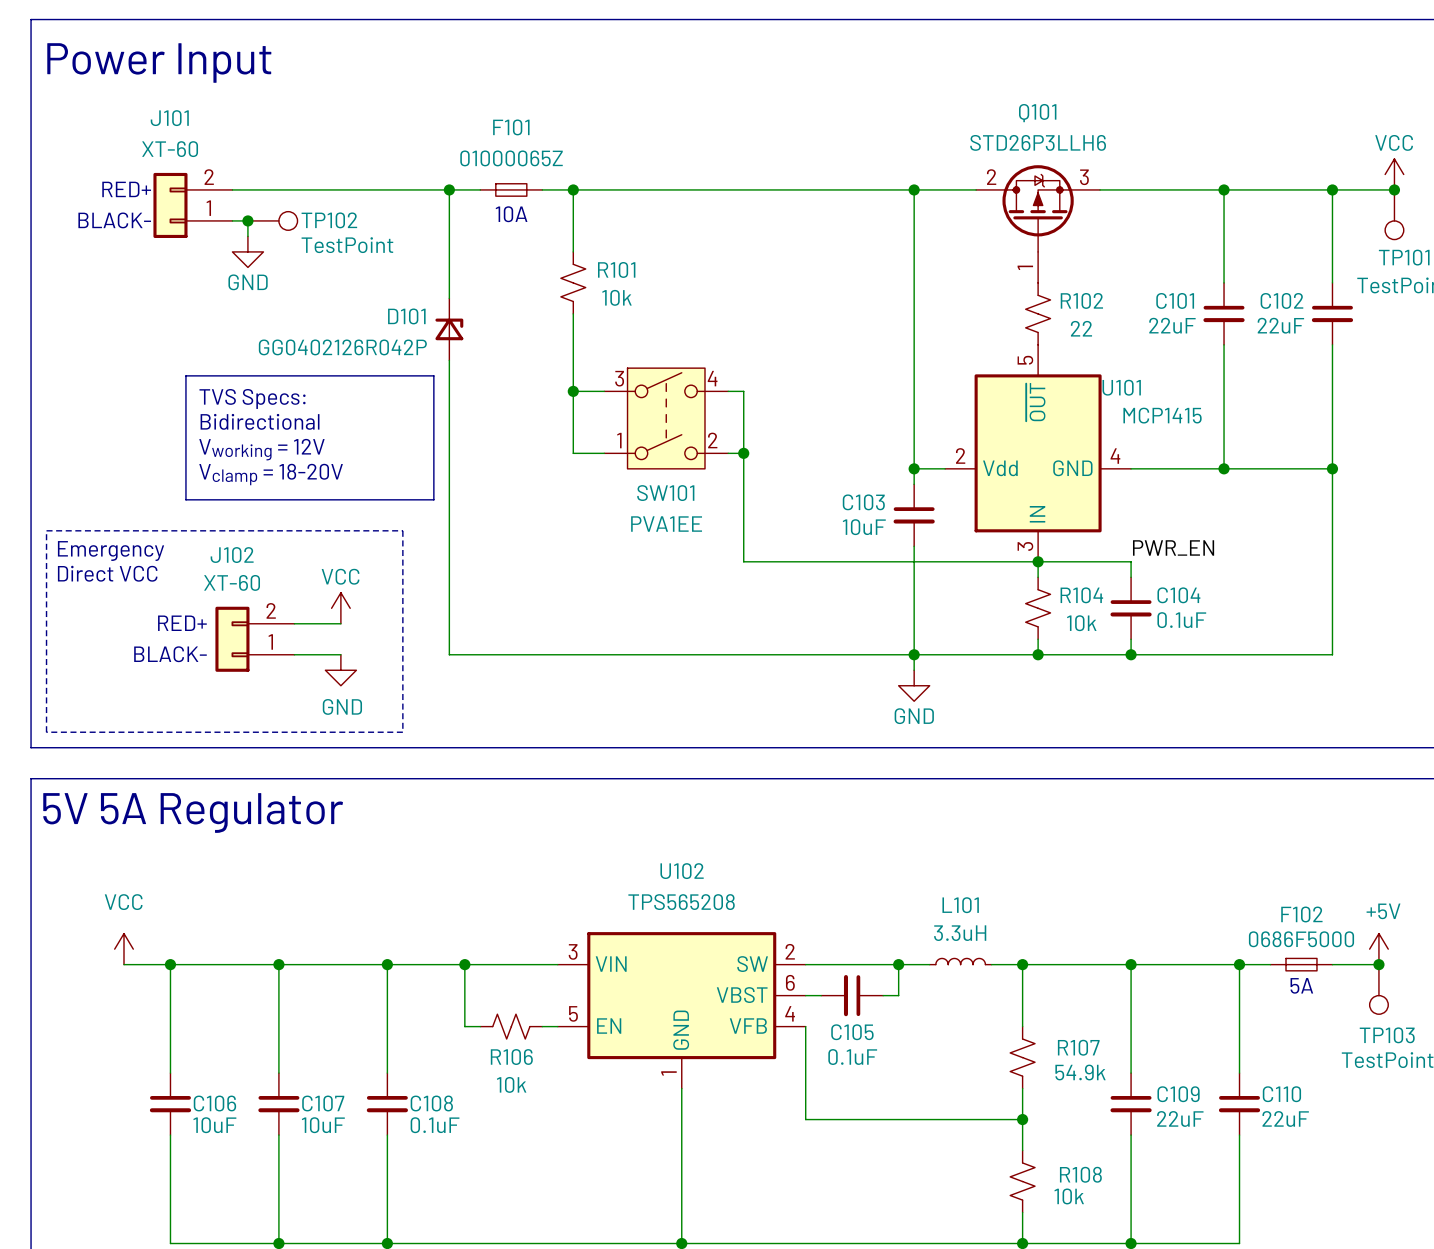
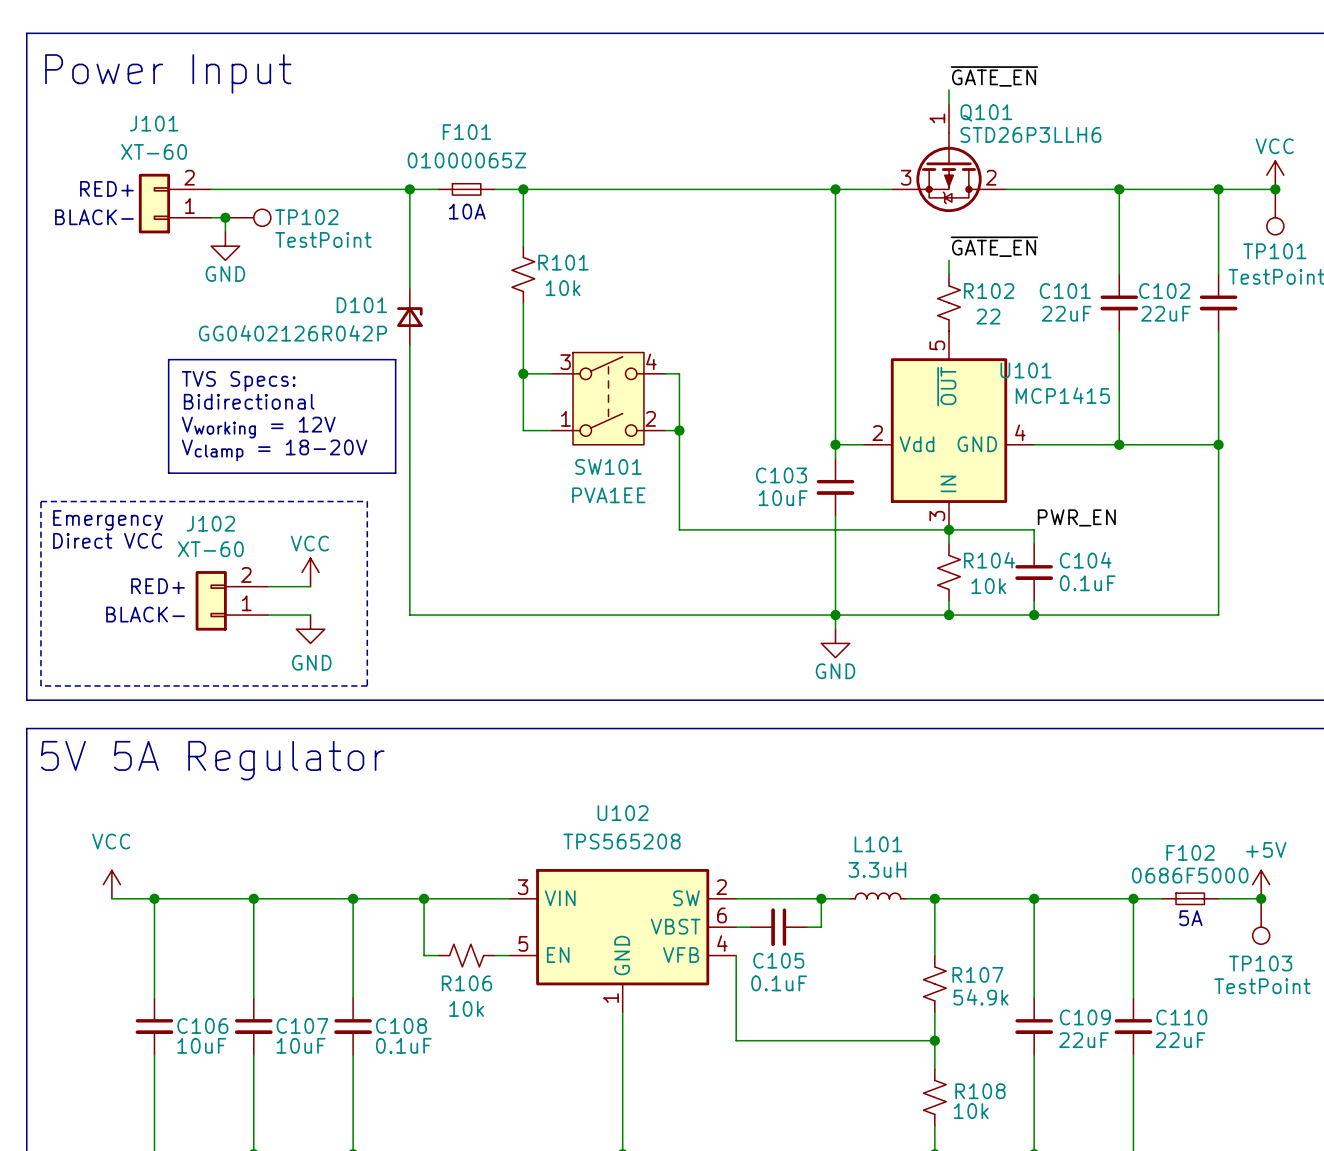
label: none -> ~{GATE_EN} (994, 76)
wire: none -> (949, 90) (949, 104)
Q101 name position: Q101 (1037, 113) -> Q101 (986, 112)
Q101 value position: STD26P3LLH6 (1038, 142) -> STD26P3LLH6 (1030, 134)
Q101 rotation: 0° (1038, 208) -> 180° (949, 172)
label: none -> ~{GATE_EN} (994, 246)

